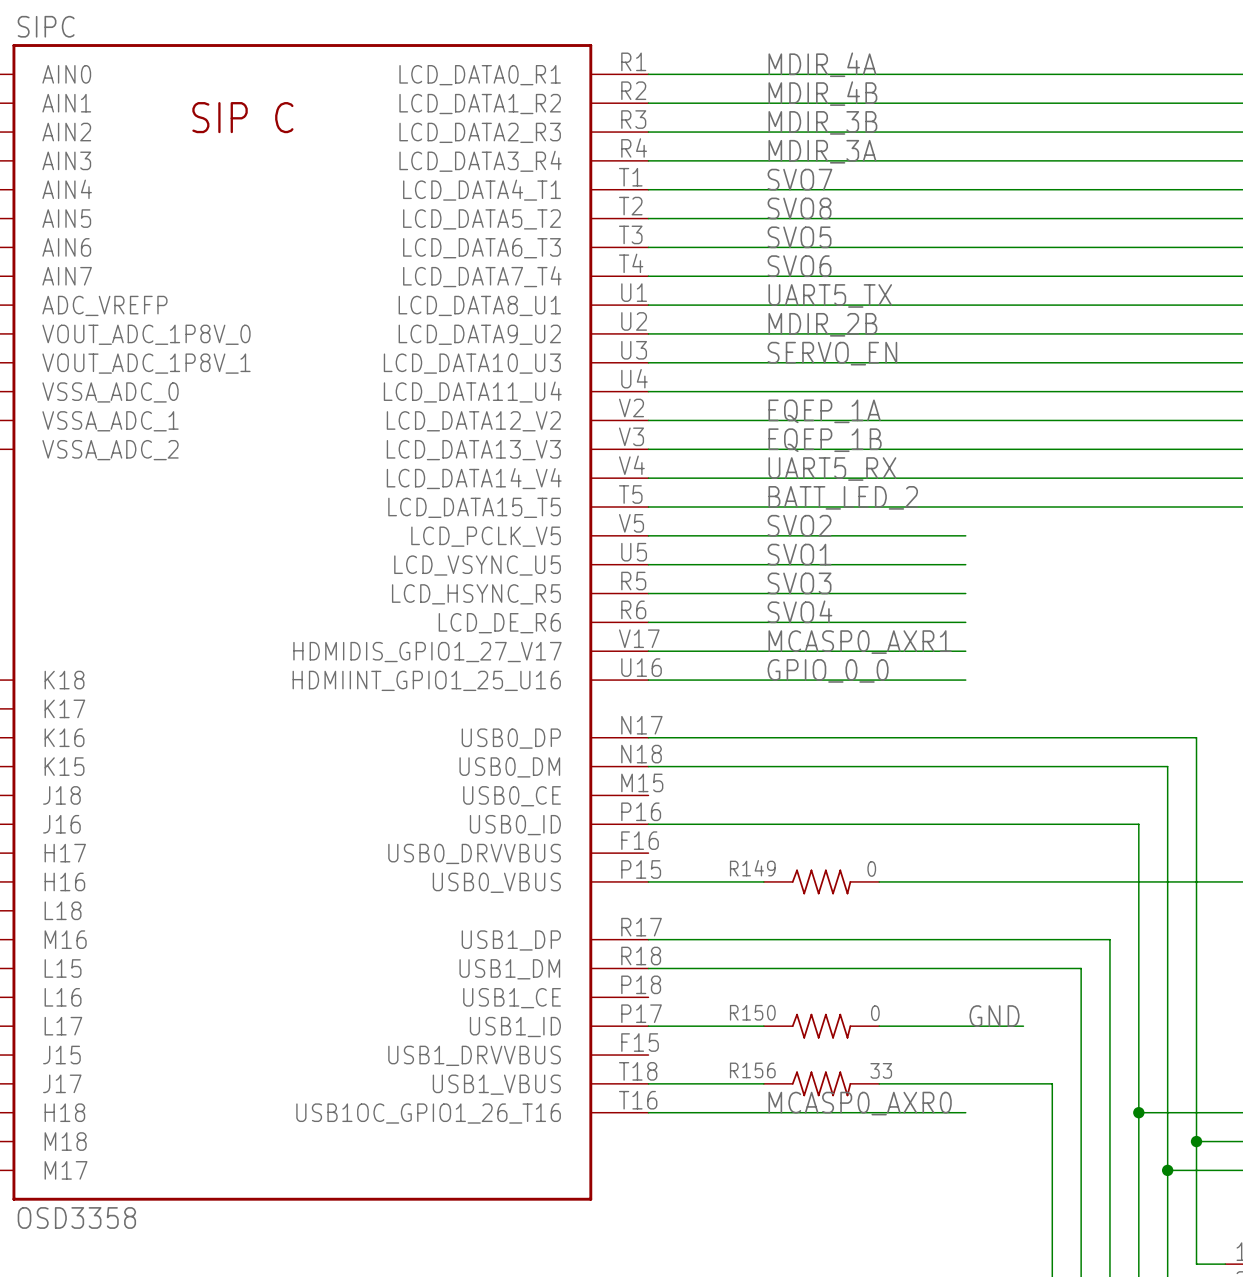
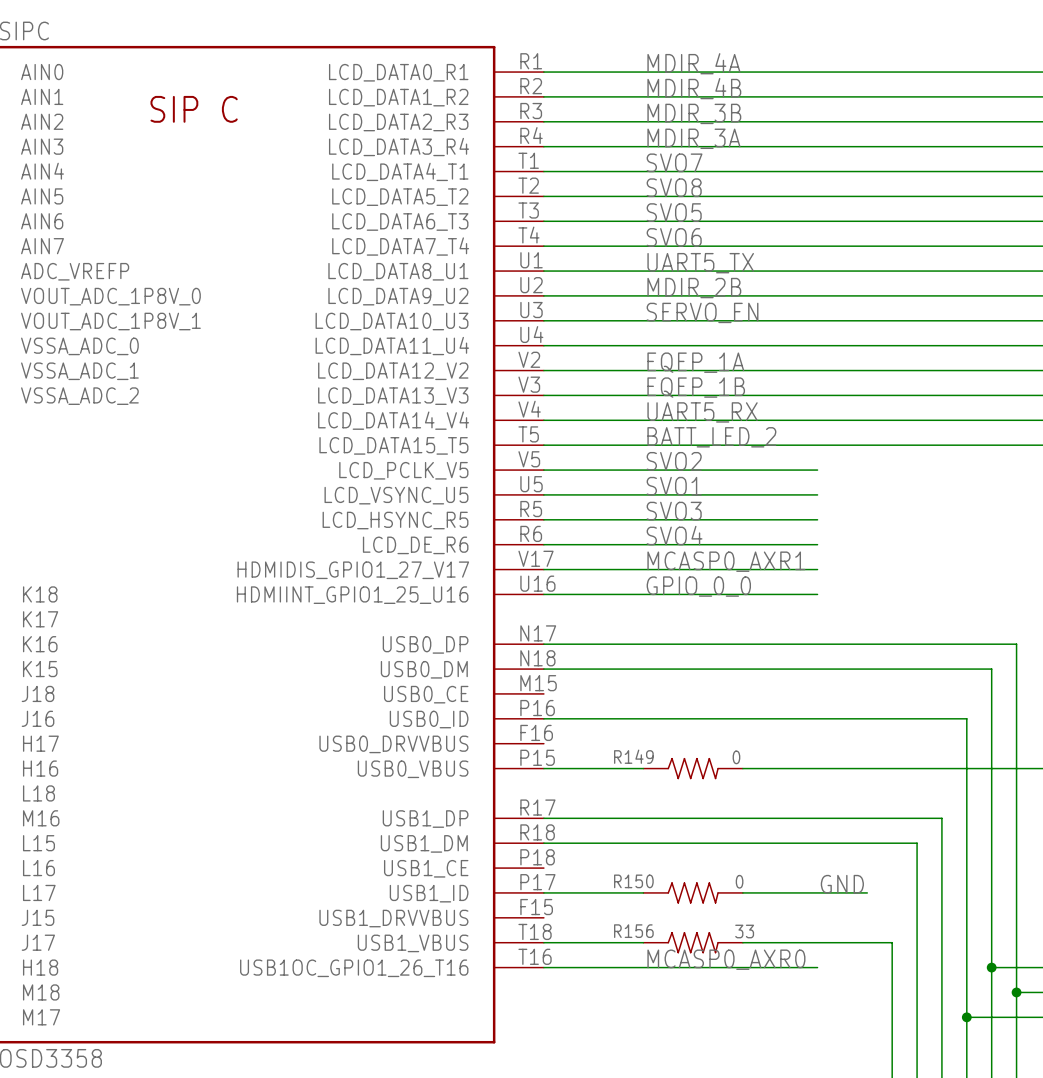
wire: (1138, 1112) (1167, 1112) -> (966, 1017) (991, 1017)
junction: (1138, 1112) -> none
junction: none -> (991, 967)
junction: none -> (966, 1017)
junction: (1167, 1170) -> none

